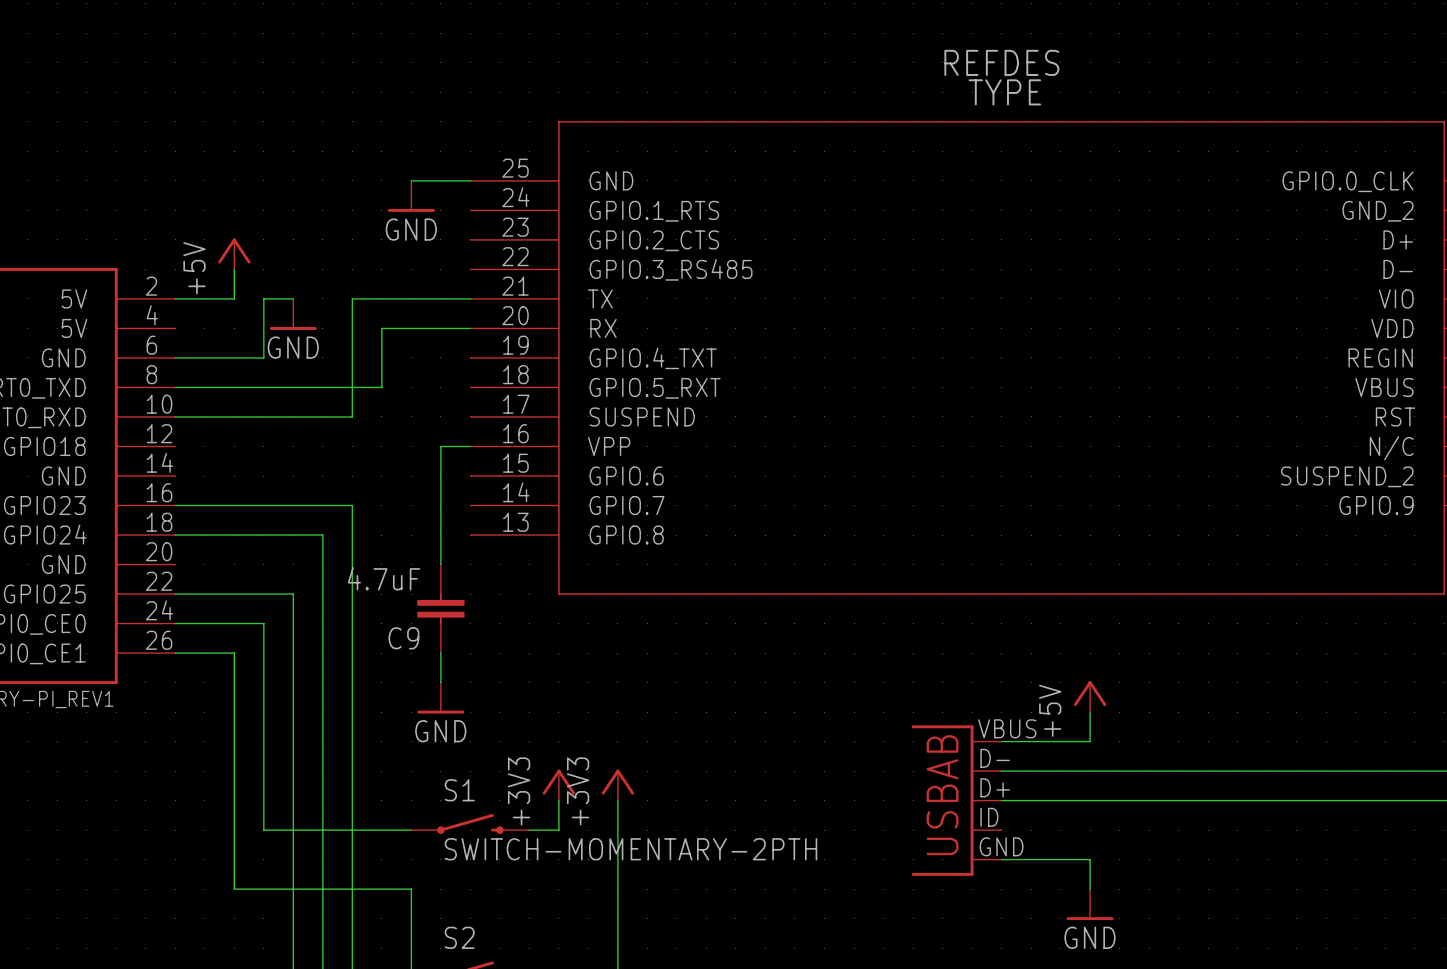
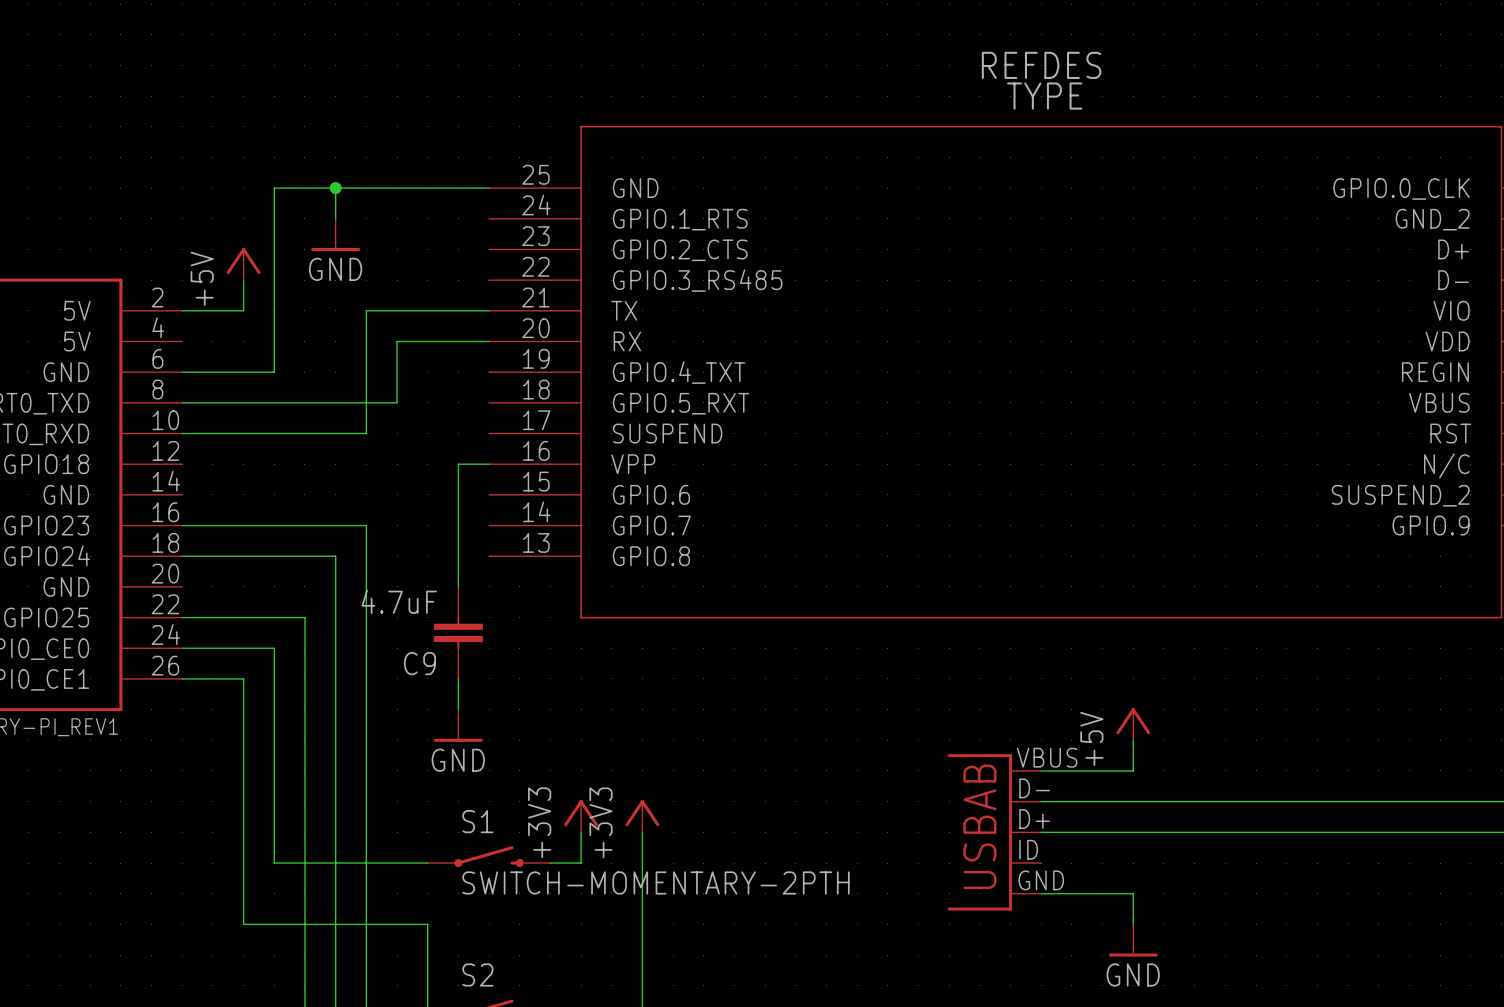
wire: none -> (335, 188) (335, 218)
junction: none -> (335, 188)
power symbol: GND (411, 196) -> none
power symbol: none -> GND (335, 234)
wire: (263, 298) (293, 298) -> (274, 310) (274, 188) (427, 188)
power symbol: GND (293, 314) -> none

